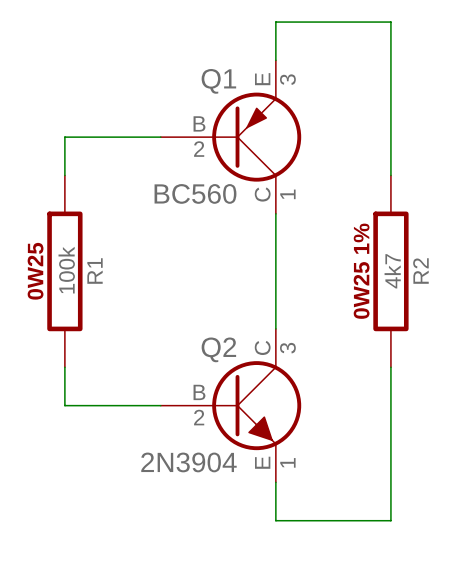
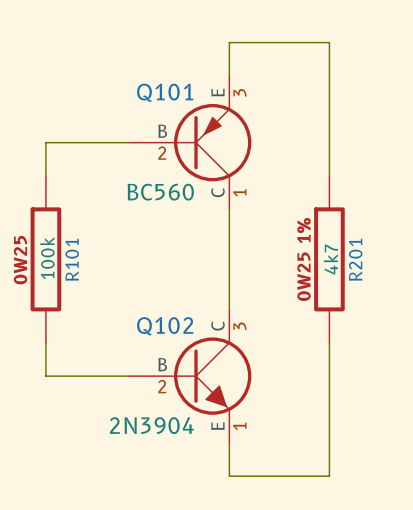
Q1 name: Q1 (218, 81) -> Q101 (165, 92)
R1 name: R1 (95, 271) -> R101 (72, 259)
R2 name: R2 (420, 271) -> R201 (355, 259)
Q2 name: Q2 (218, 349) -> Q102 (165, 326)

